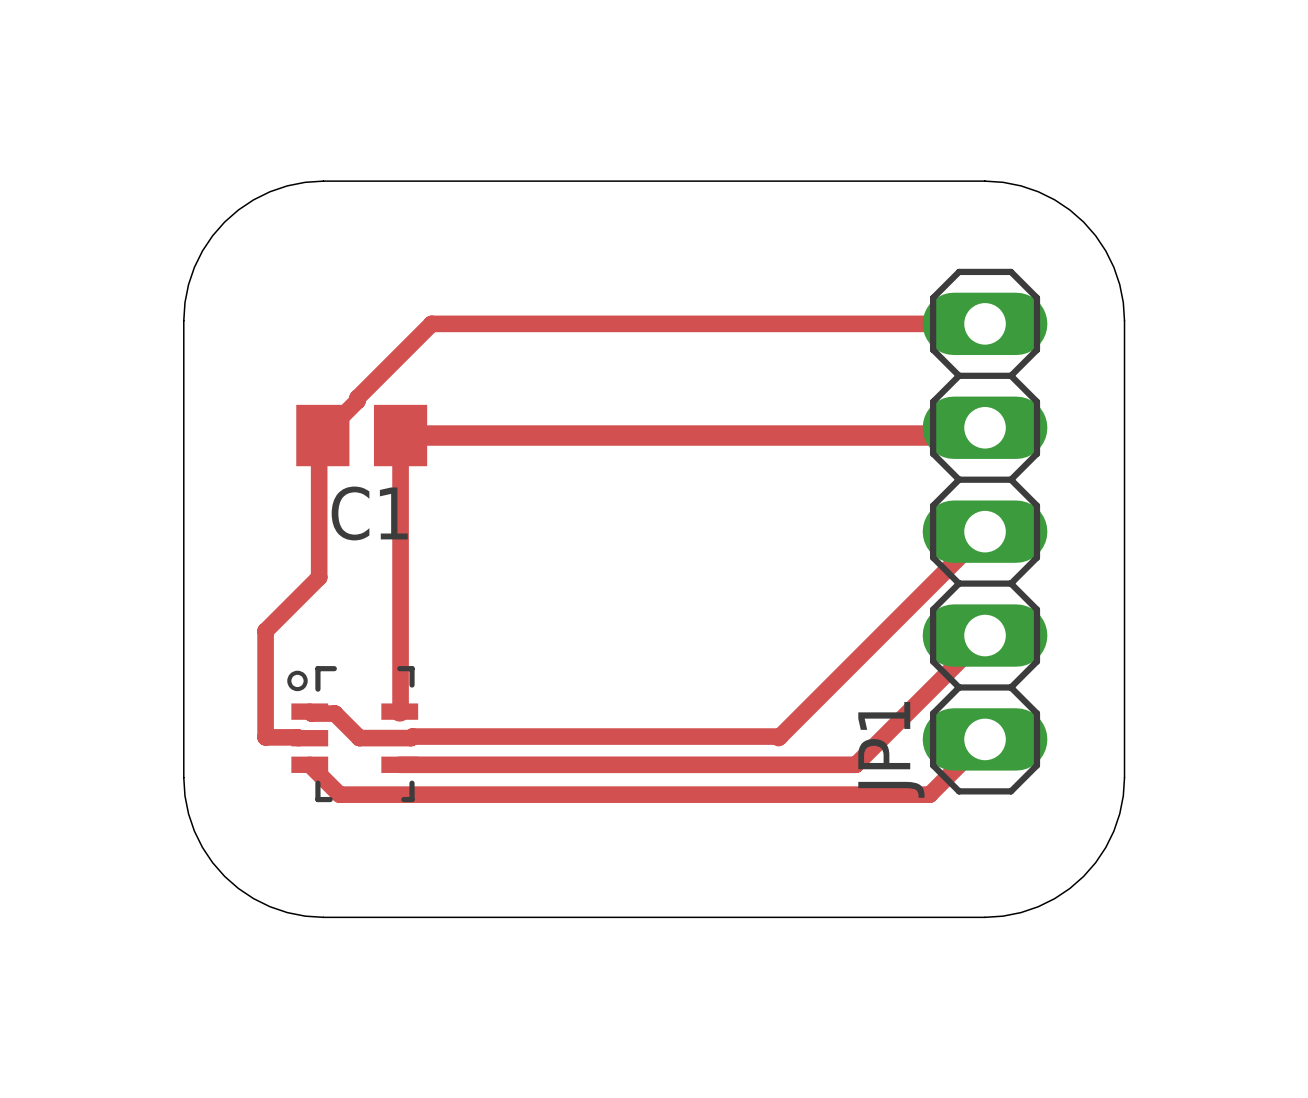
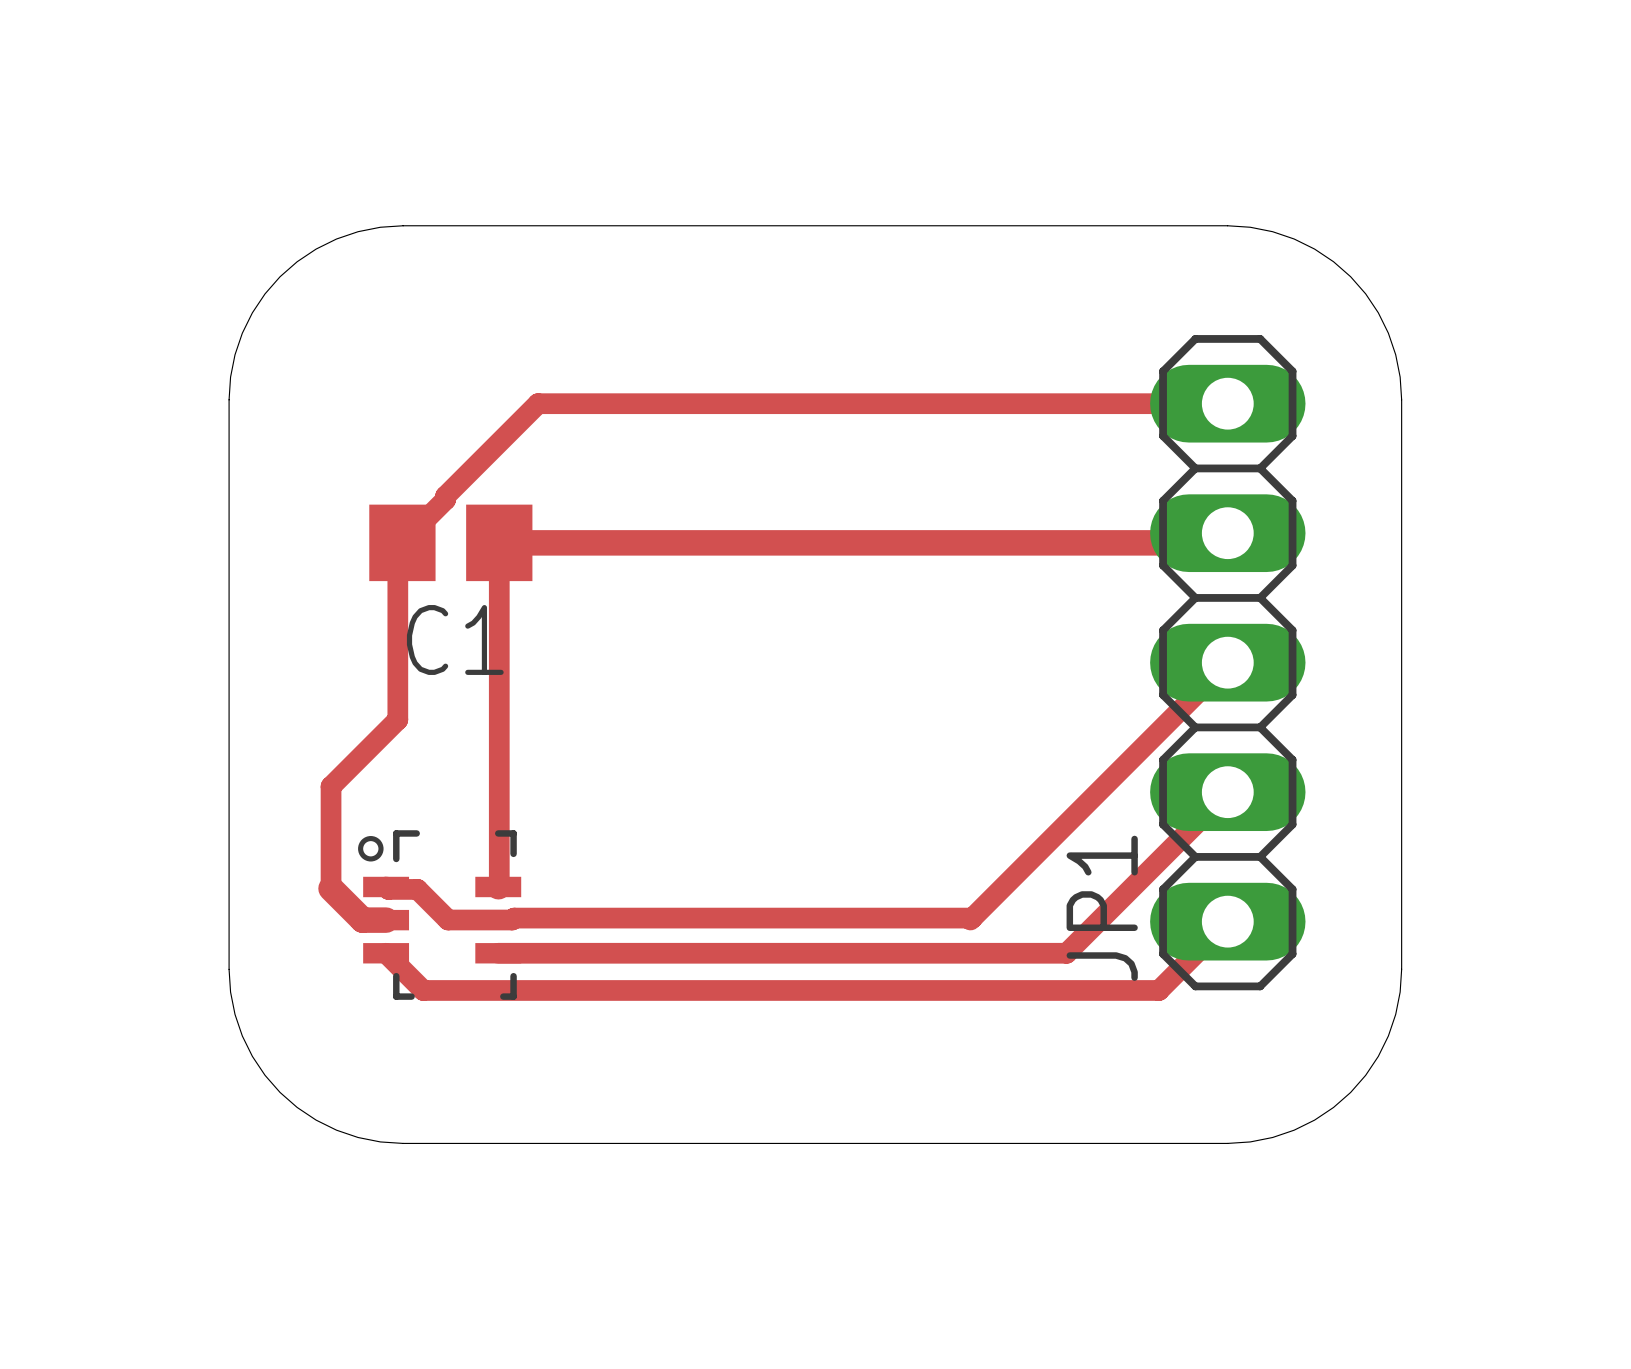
top track: (265, 712) (265, 737) (298, 738) -> (331, 888) (362, 920) (386, 920)

